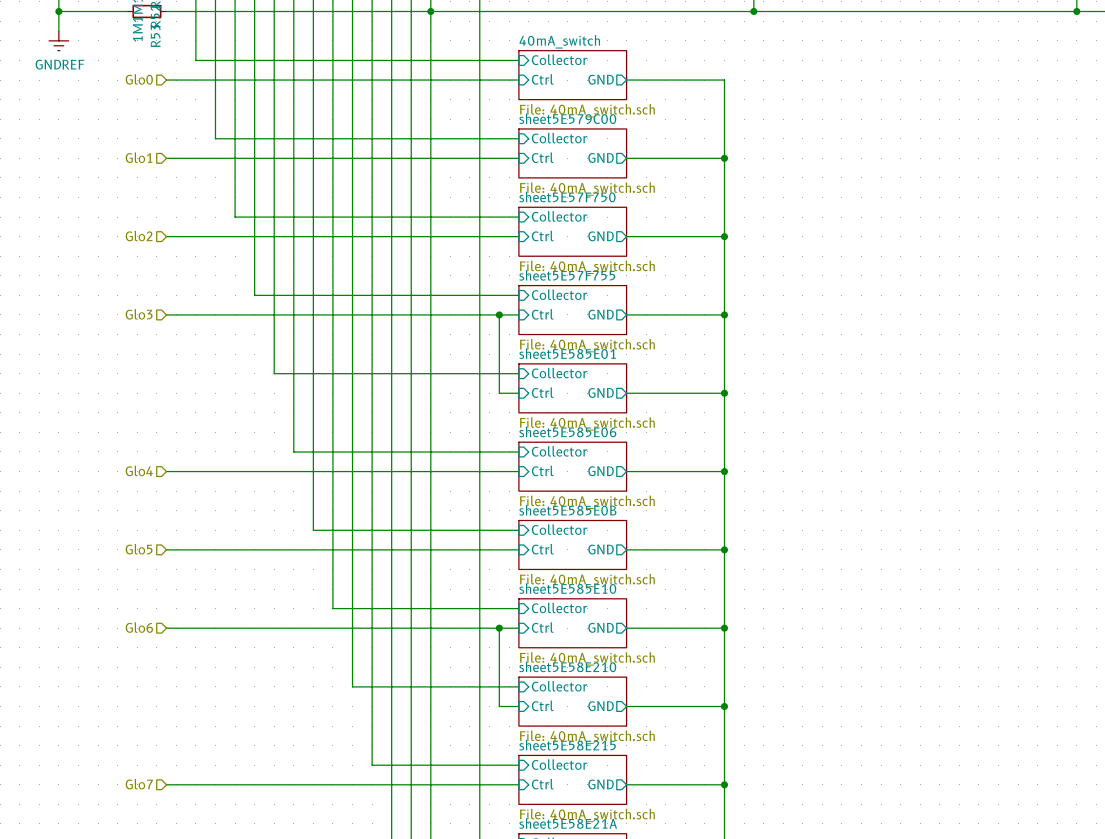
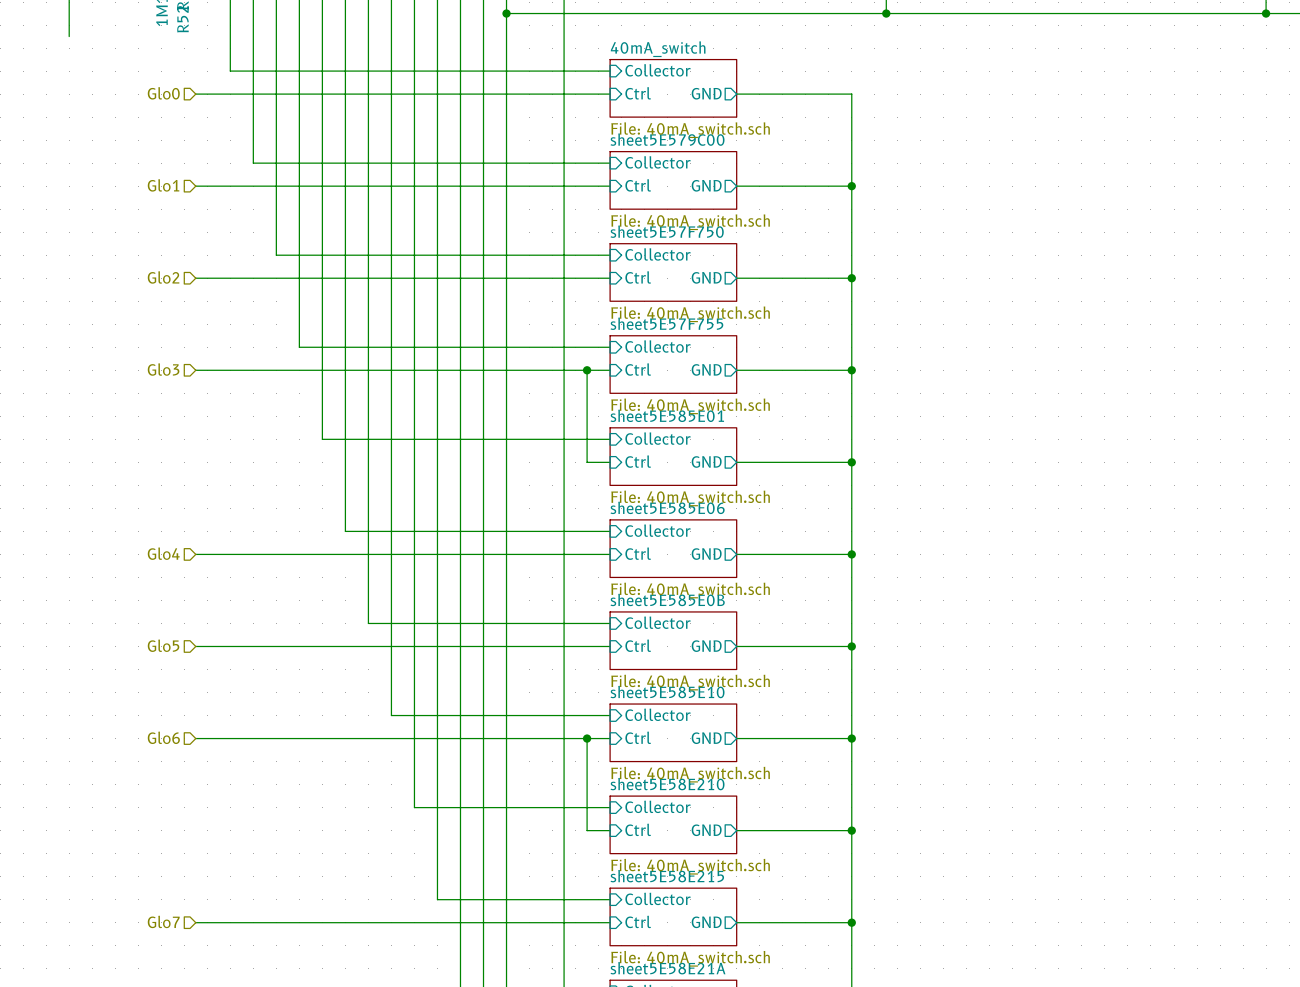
wire: (58, 11) (127, 11) -> none
junction: (58, 11) -> none
R53: 1M (146, 11) -> none
wire: (166, 11) (430, 11) -> none
power symbol: GNDREF (58, 40) -> none

